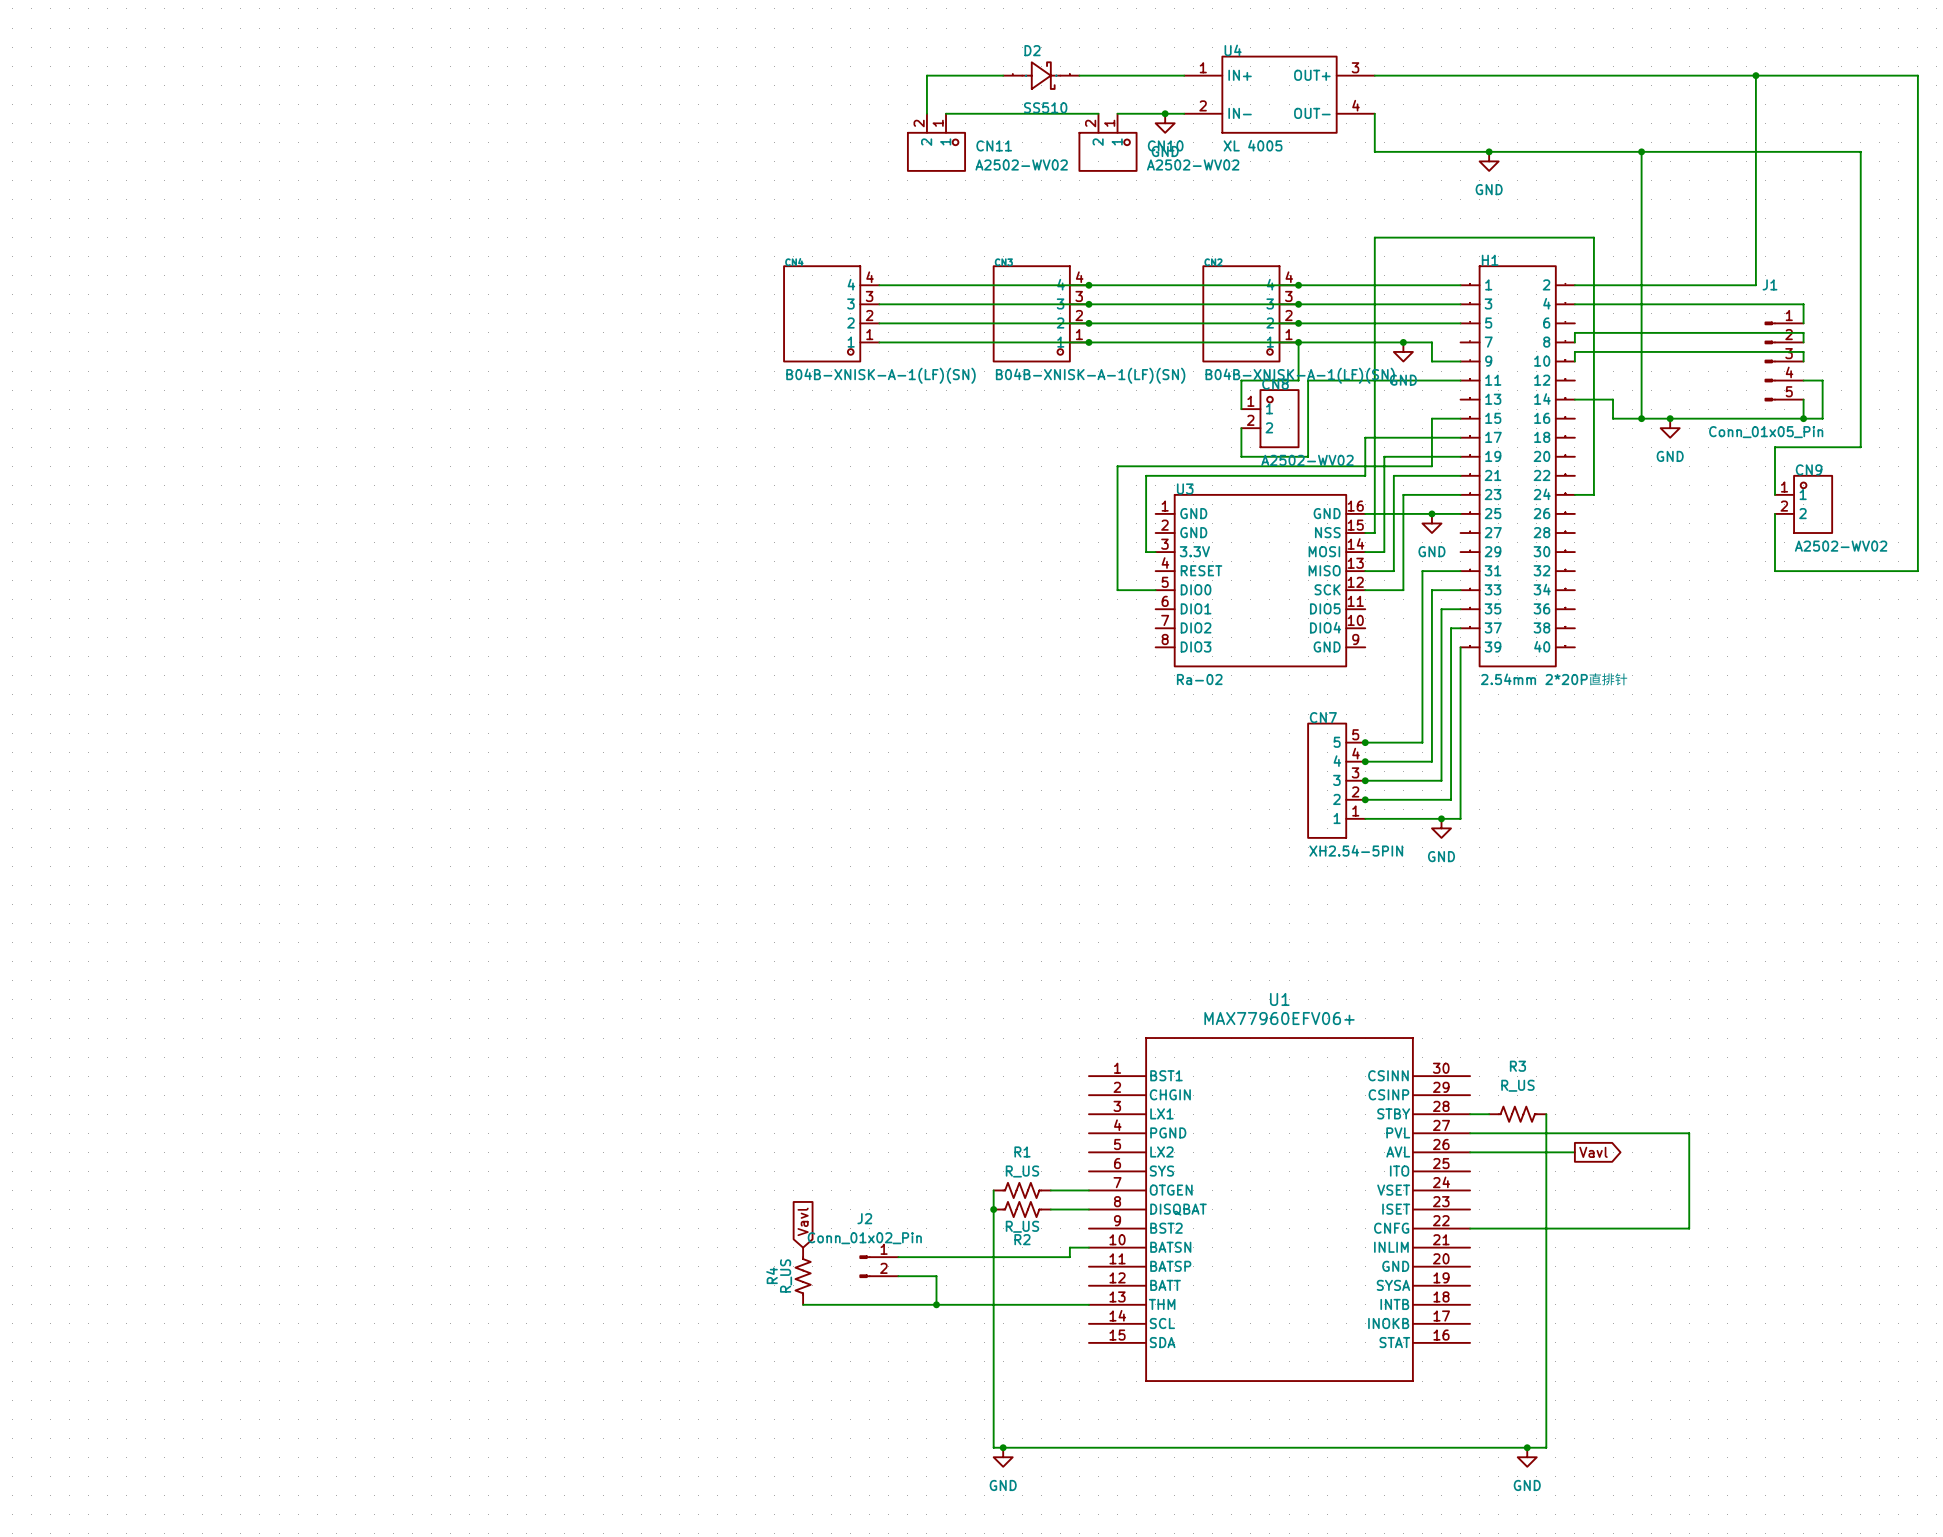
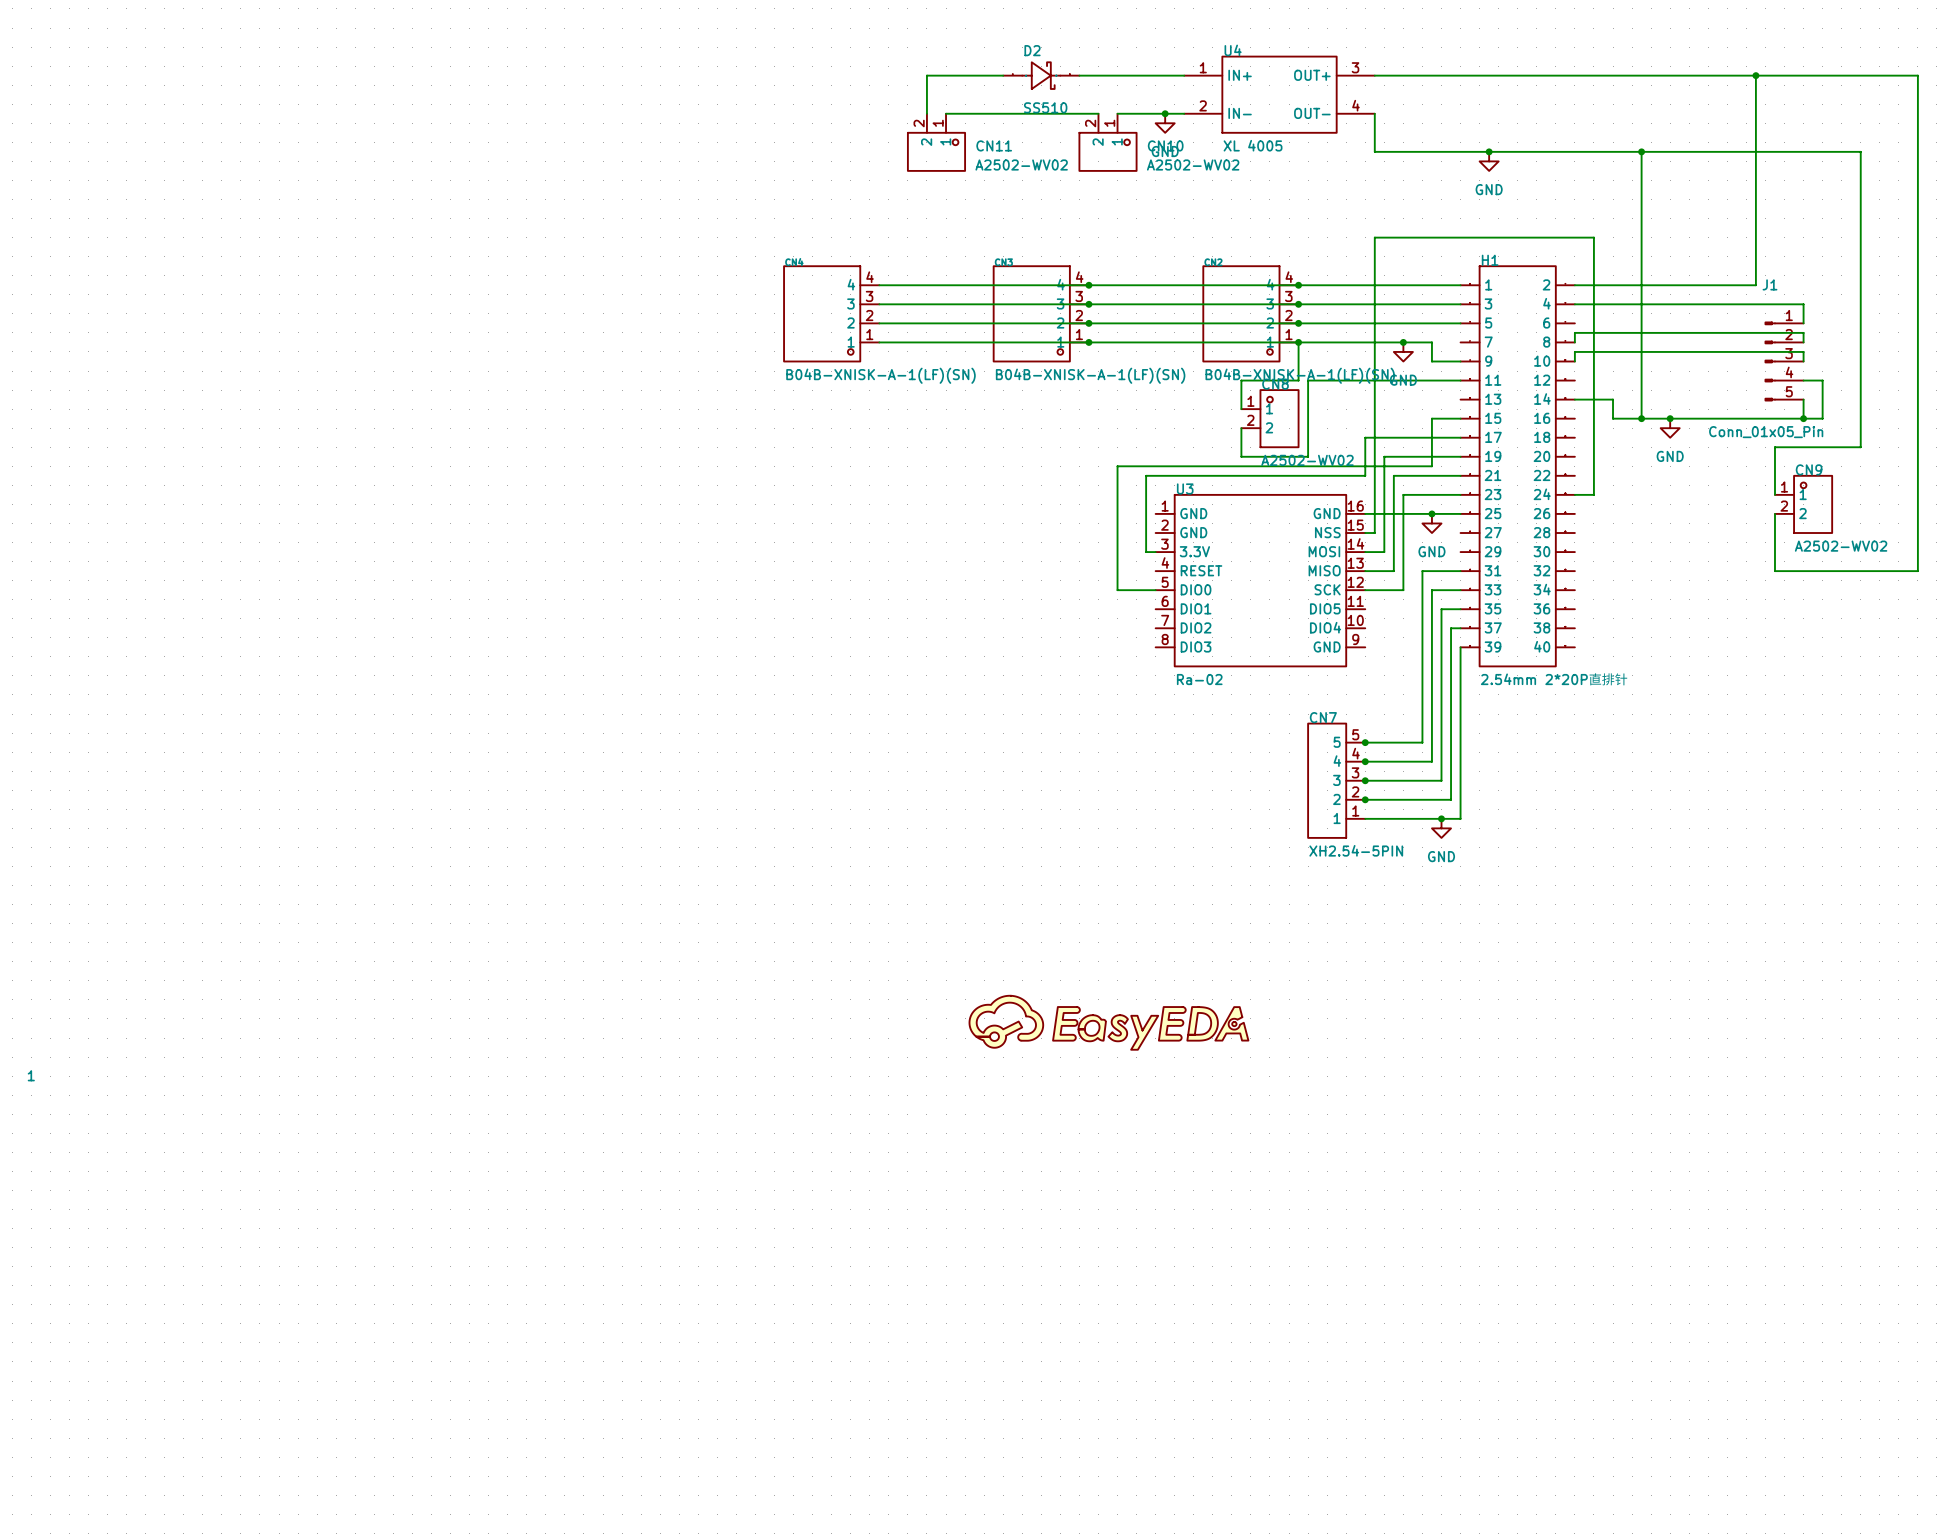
1: none -> (1108, 1022)
wire: (1470, 1114) (1489, 1114) -> none
R3: R_US (1517, 1114) -> none
wire: (1546, 1114) (1546, 1447) (993, 1447) (993, 1190) -> none
wire: (1470, 1133) (1689, 1133) (1689, 1228) (1470, 1228) -> none
wire: (1470, 1152) (1574, 1152) -> none
global label: Vavl (1593, 1152) -> none
R1: R_US (1022, 1190) -> none
wire: (1050, 1190) (1088, 1190) -> none
junction: (993, 1209) -> none
R2: R_US (1022, 1209) -> none
wire: (1050, 1209) (1088, 1209) -> none
U1: MAX77960EFV06+ (1279, 1209) -> none
global label: Vavl (803, 1221) -> none
wire: (1088, 1247) (1069, 1247) (1069, 1257) (898, 1257) -> none
J2: Conn_01x02_Pin (879, 1266) -> none
R4: R_US (803, 1276) -> none
wire: (898, 1276) (936, 1276) (936, 1304) -> none
wire: (803, 1304) (1088, 1304) -> none
junction: (936, 1304) -> none
junction: (1003, 1447) -> none
junction: (1527, 1447) -> none
power symbol: GND (1003, 1457) -> none
power symbol: GND (1527, 1457) -> none

